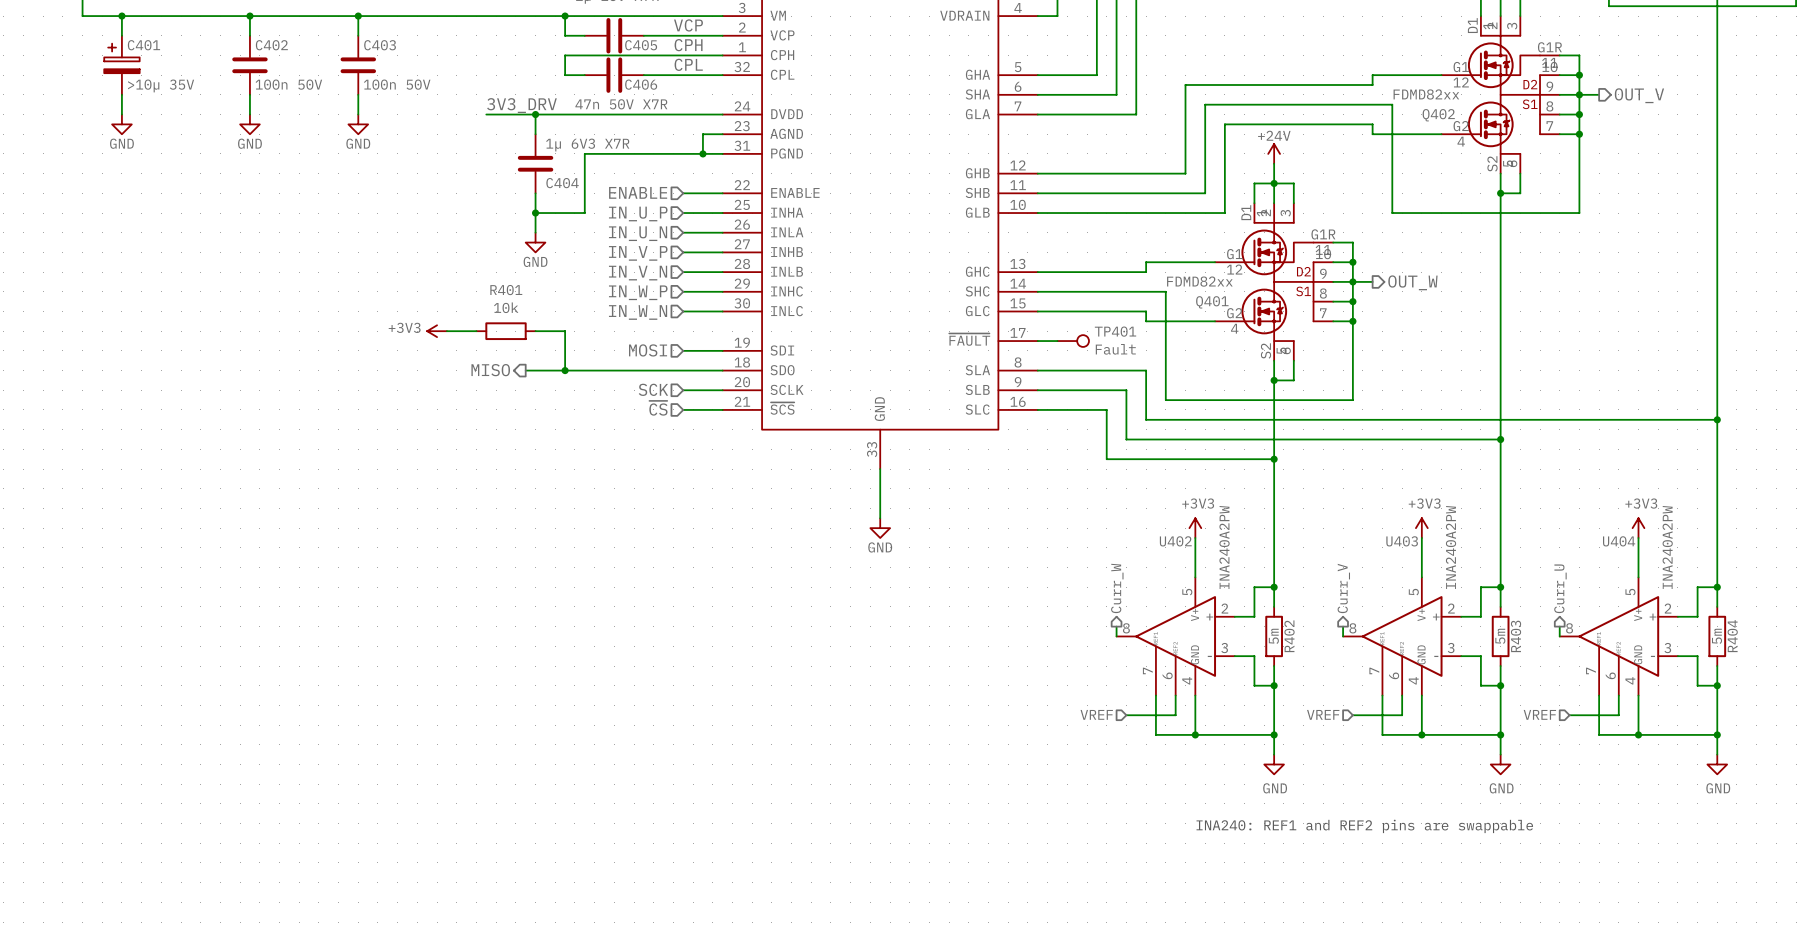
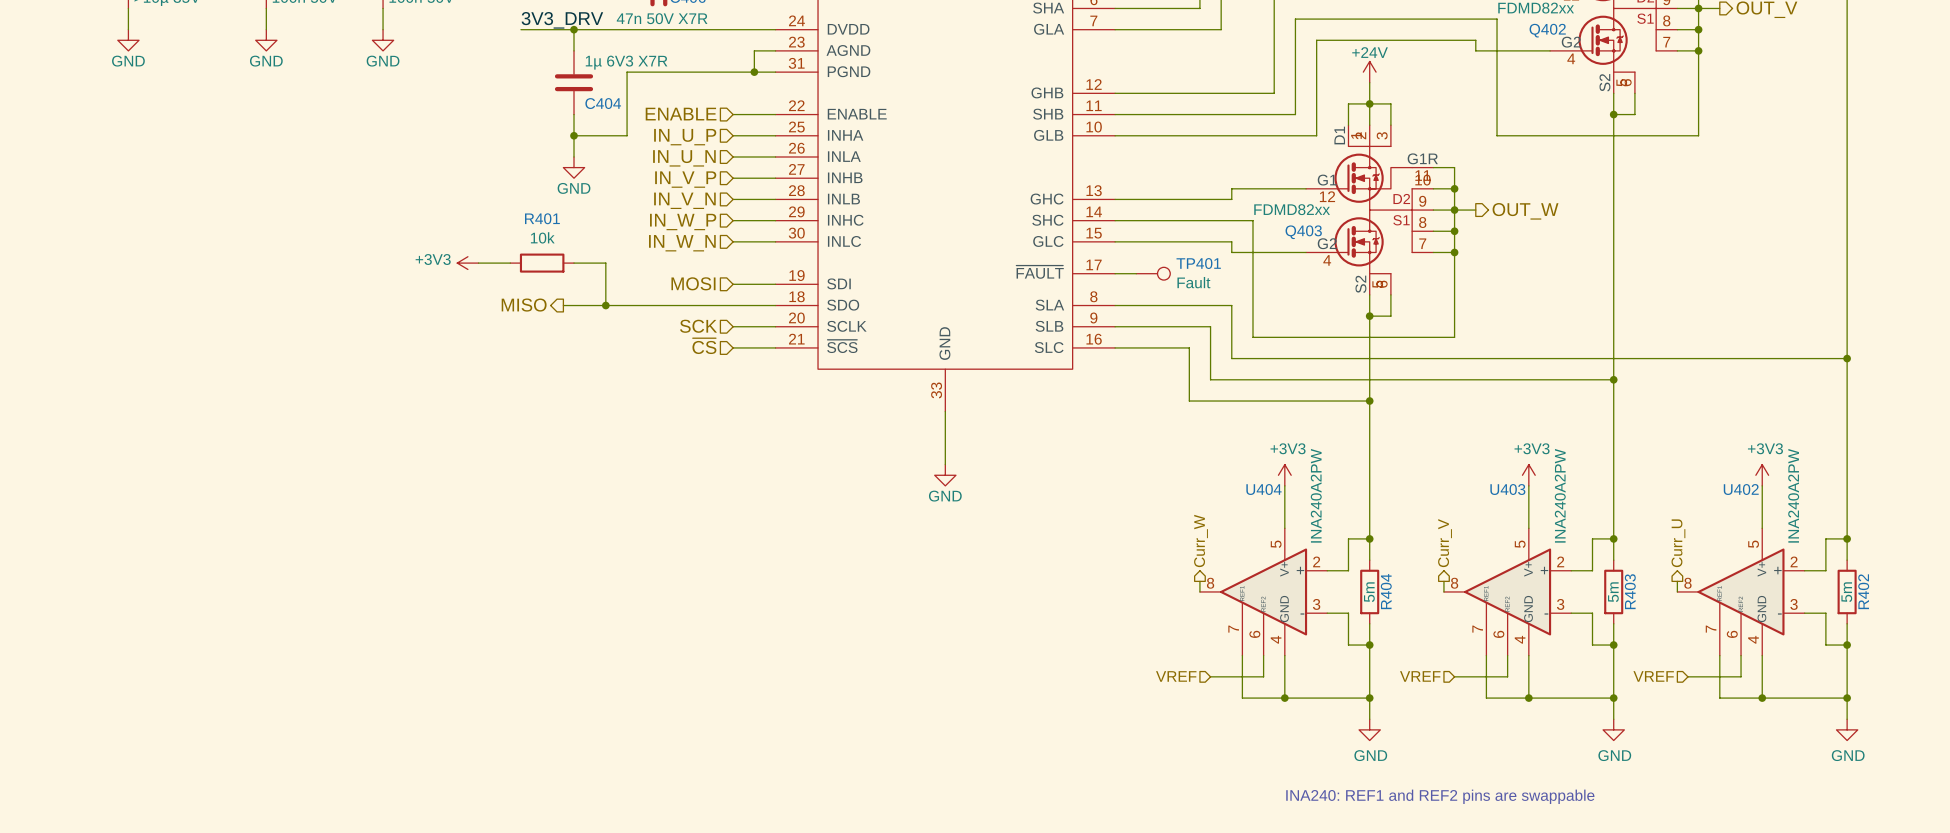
Q401 name: Q401 (1212, 302) -> Q403 (1303, 232)
U402 name: U402 (1175, 541) -> U404 (1263, 489)
U404 name: U404 (1619, 541) -> U402 (1741, 489)
R402 name: R402 (1289, 636) -> R404 (1386, 591)
R404 name: R404 (1732, 636) -> R402 (1863, 591)

